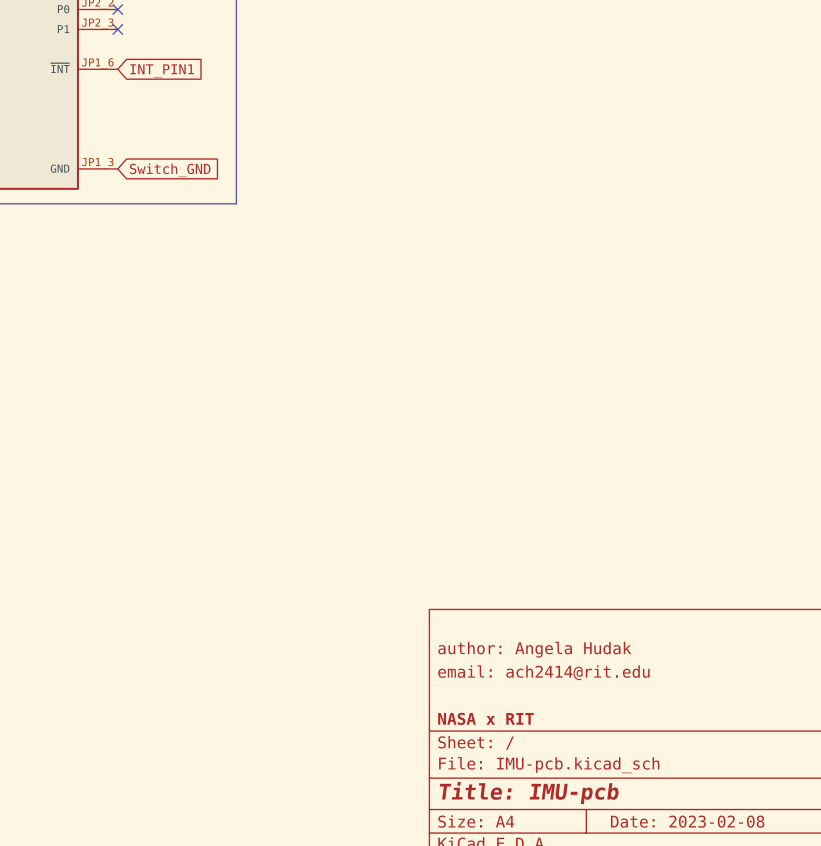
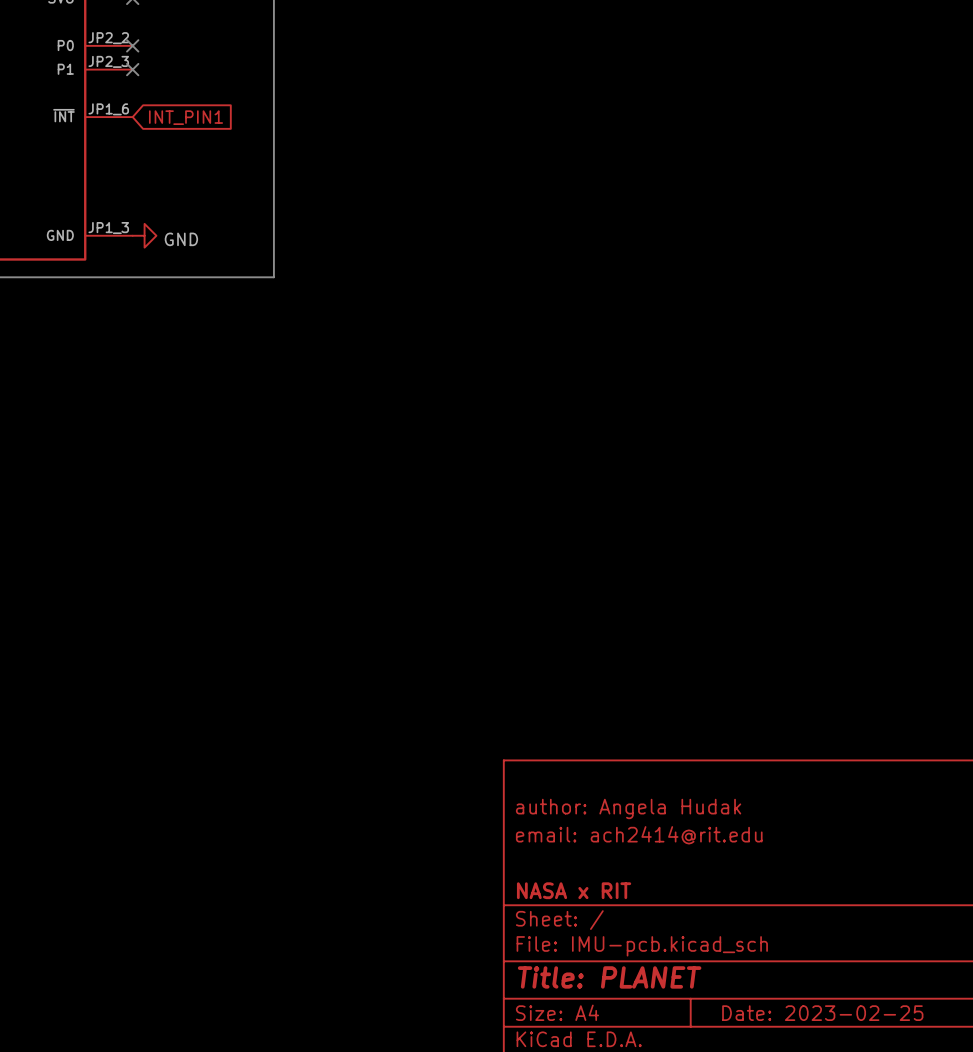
power symbol: none -> GND (144, 235)
global label: Switch_GND (170, 170) -> none
title block: Title: IMU-pcb (529, 793) -> Title: PLANET (609, 977)
title block: Date: 2023-02-08 (687, 821) -> Date: 2023-02-25 (822, 1013)

